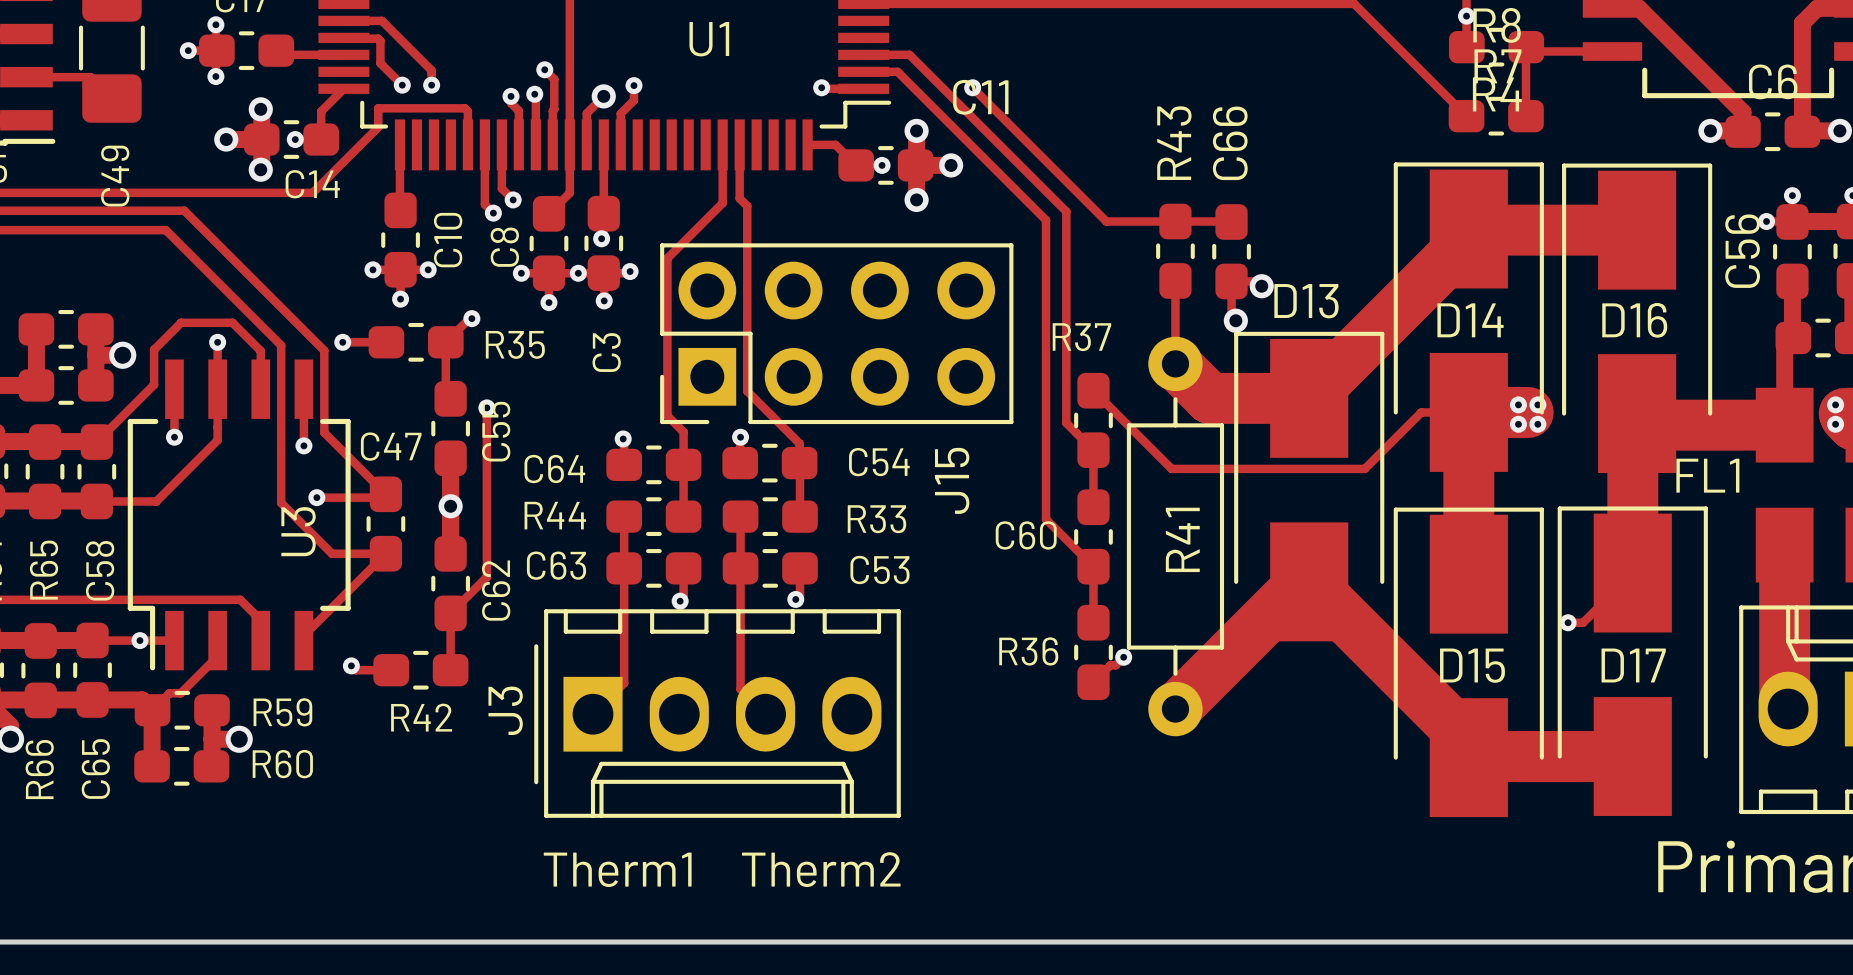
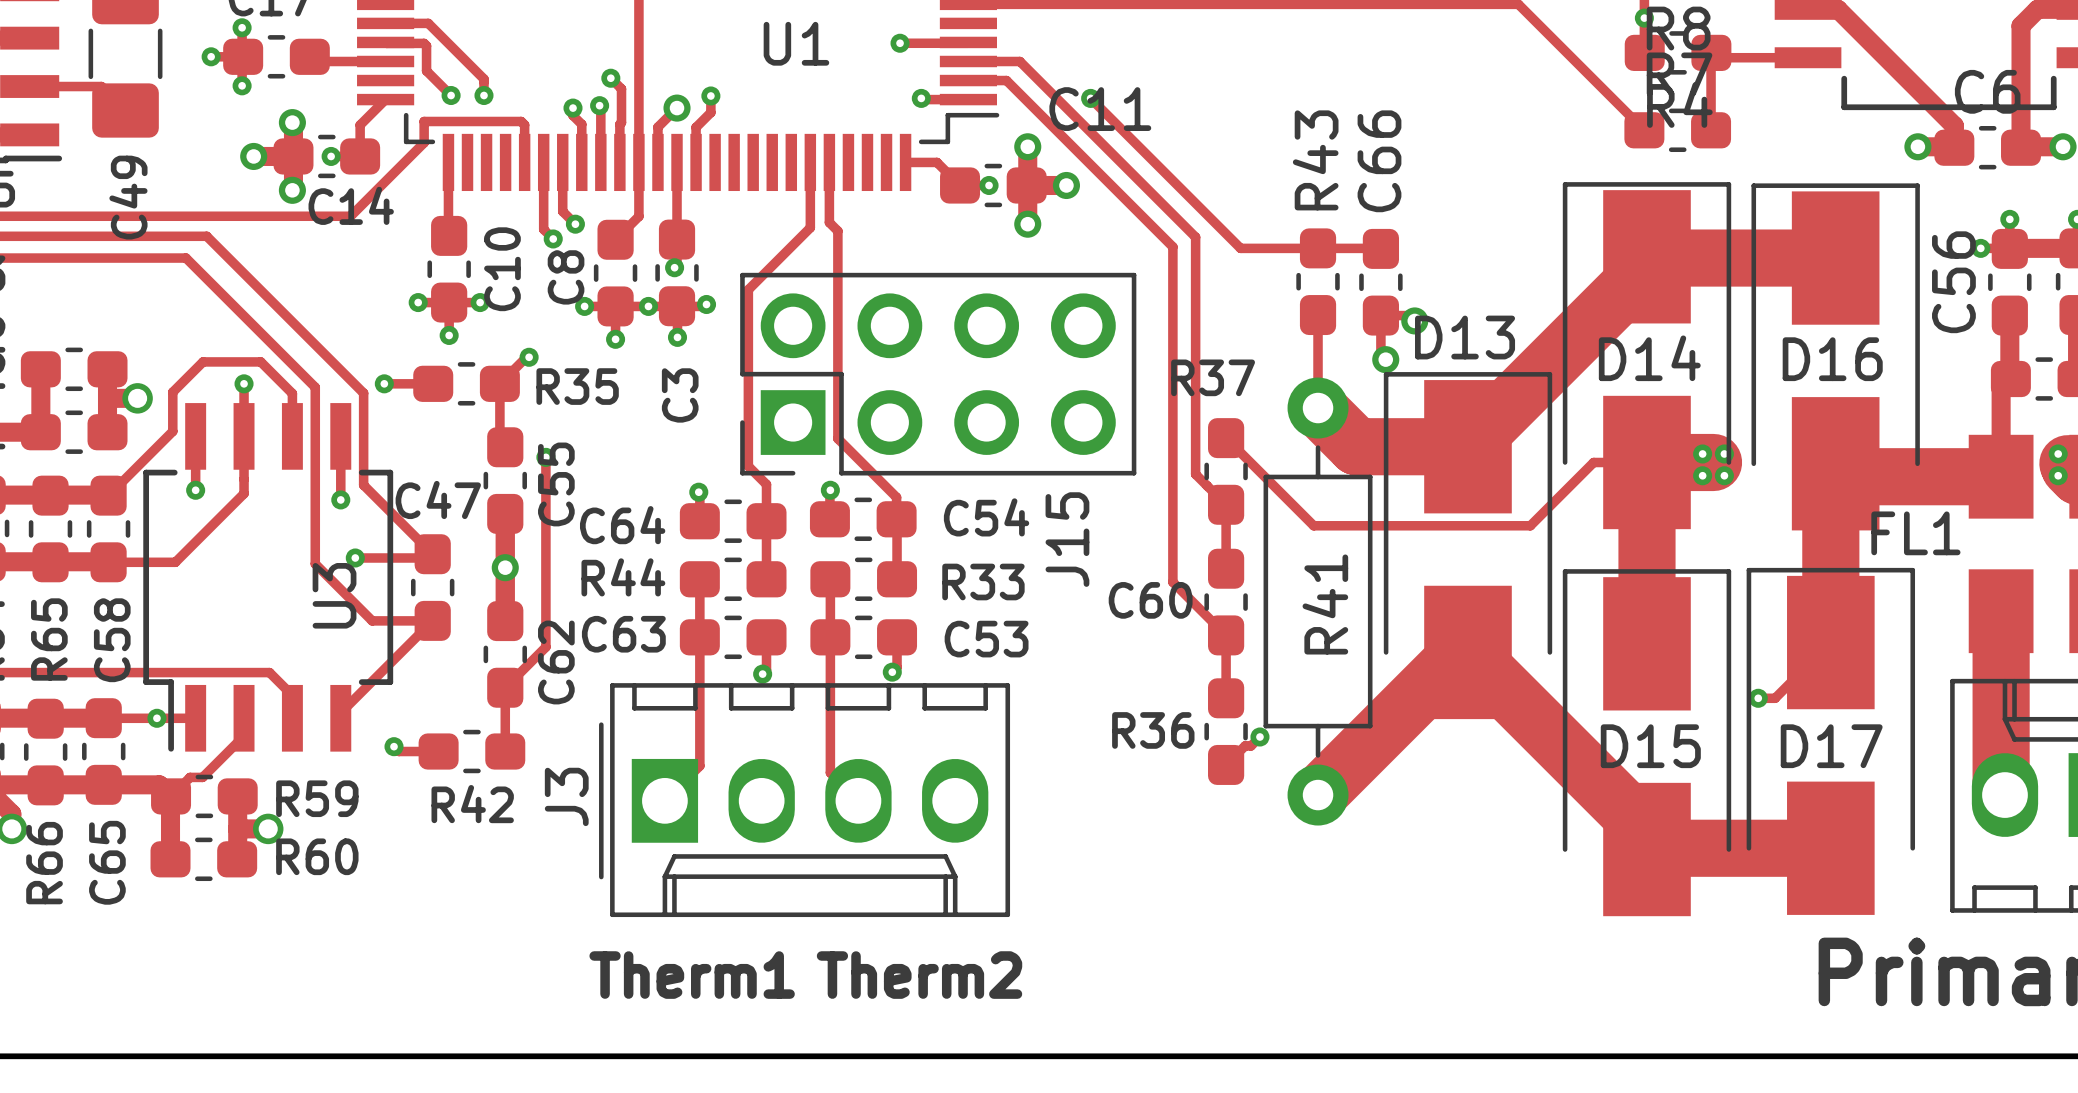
track: none -> (900, 43) (967, 43)
via: none -> (900, 43)

